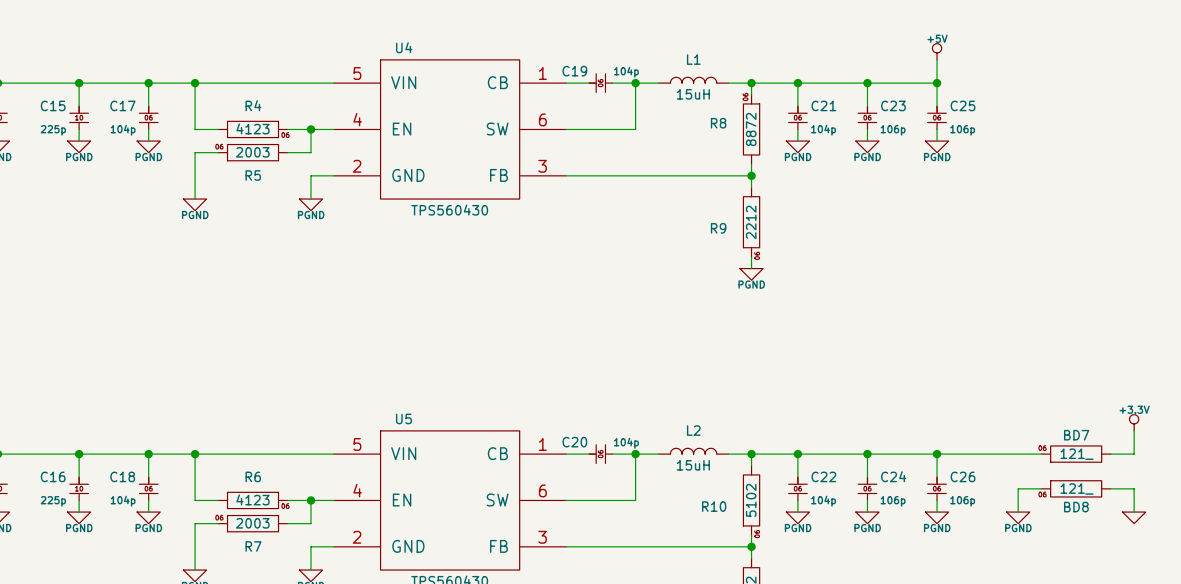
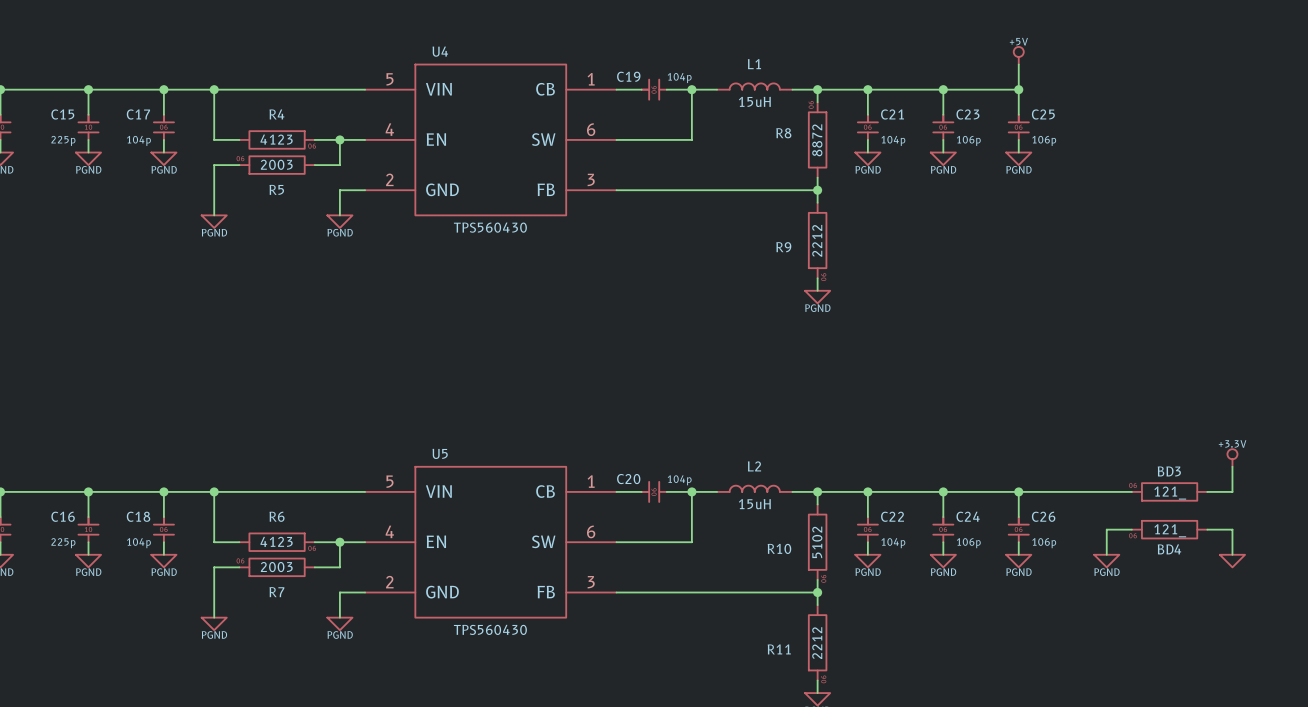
BD7 name: BD7 (1076, 435) -> BD3 (1169, 471)
BD8 name: BD8 (1076, 507) -> BD4 (1169, 549)

